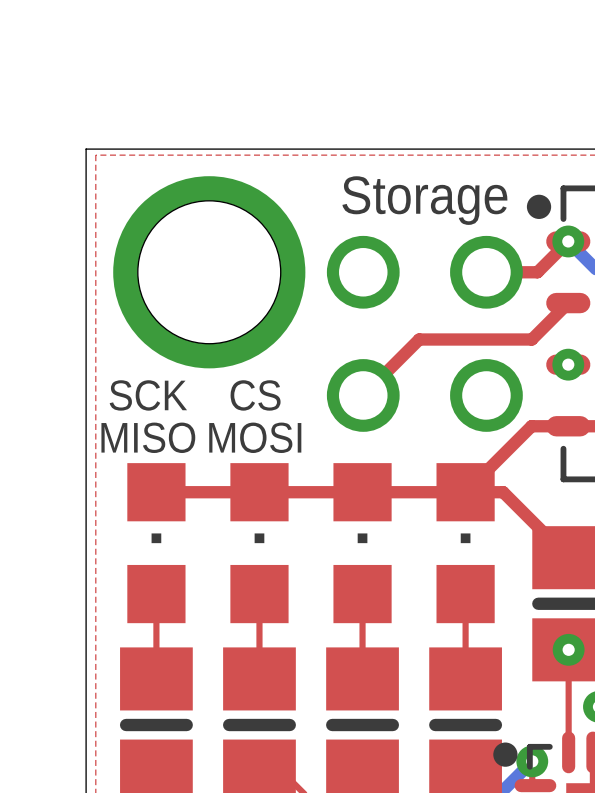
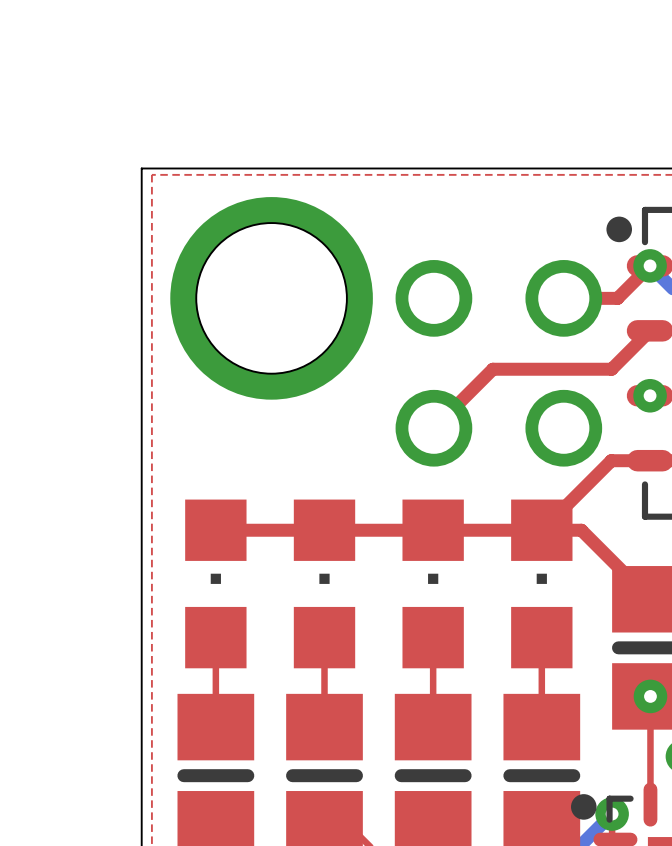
text: Storage (424, 200) -> none
text: SCK (148, 395) -> none
text: CS (255, 395) -> none
text: MISO (148, 437) -> none
text: MOSI (255, 437) -> none

